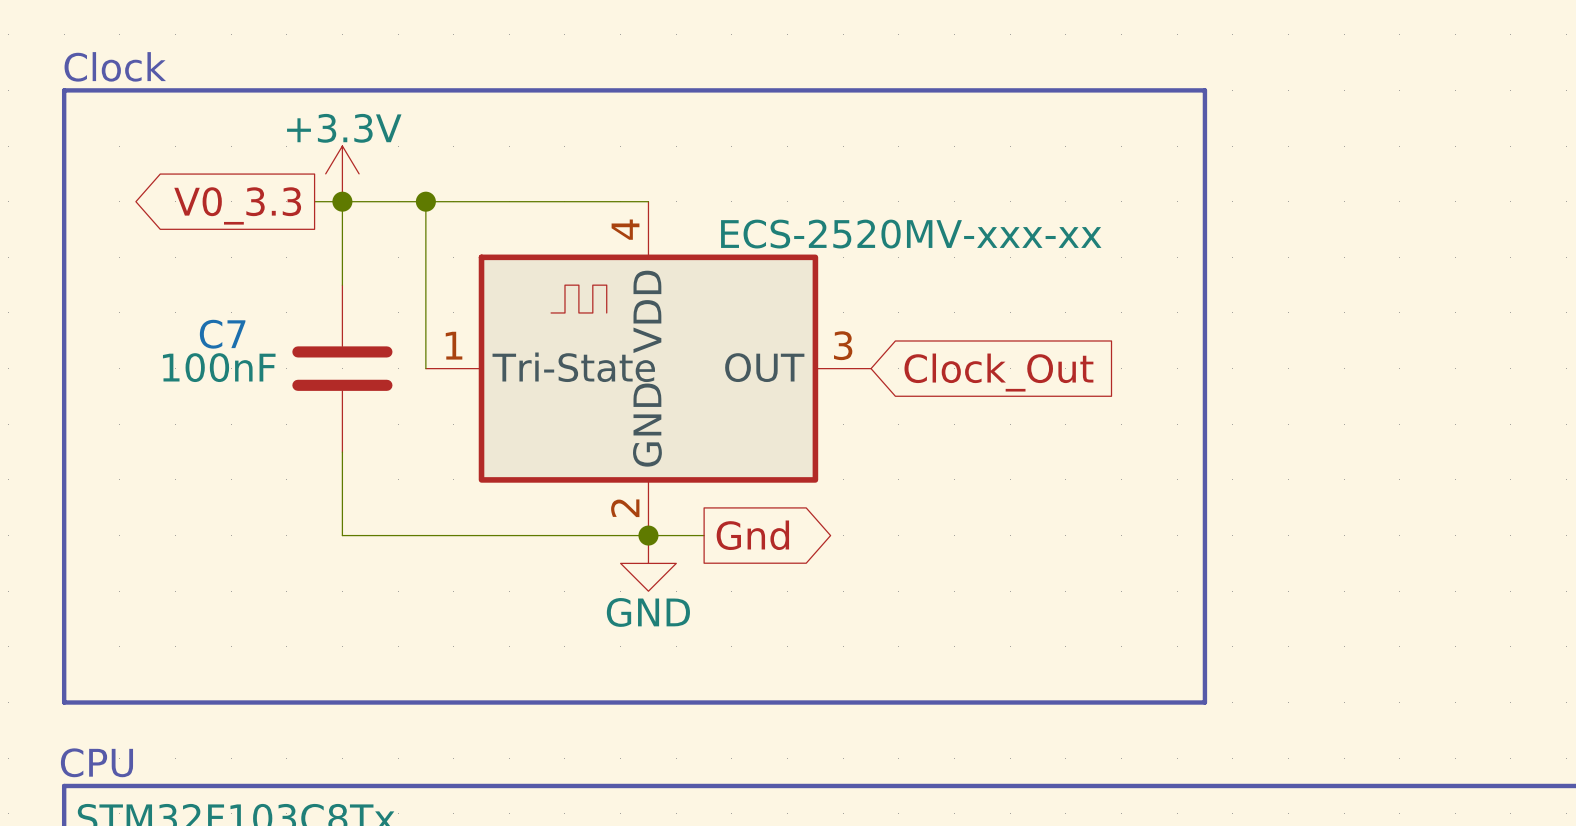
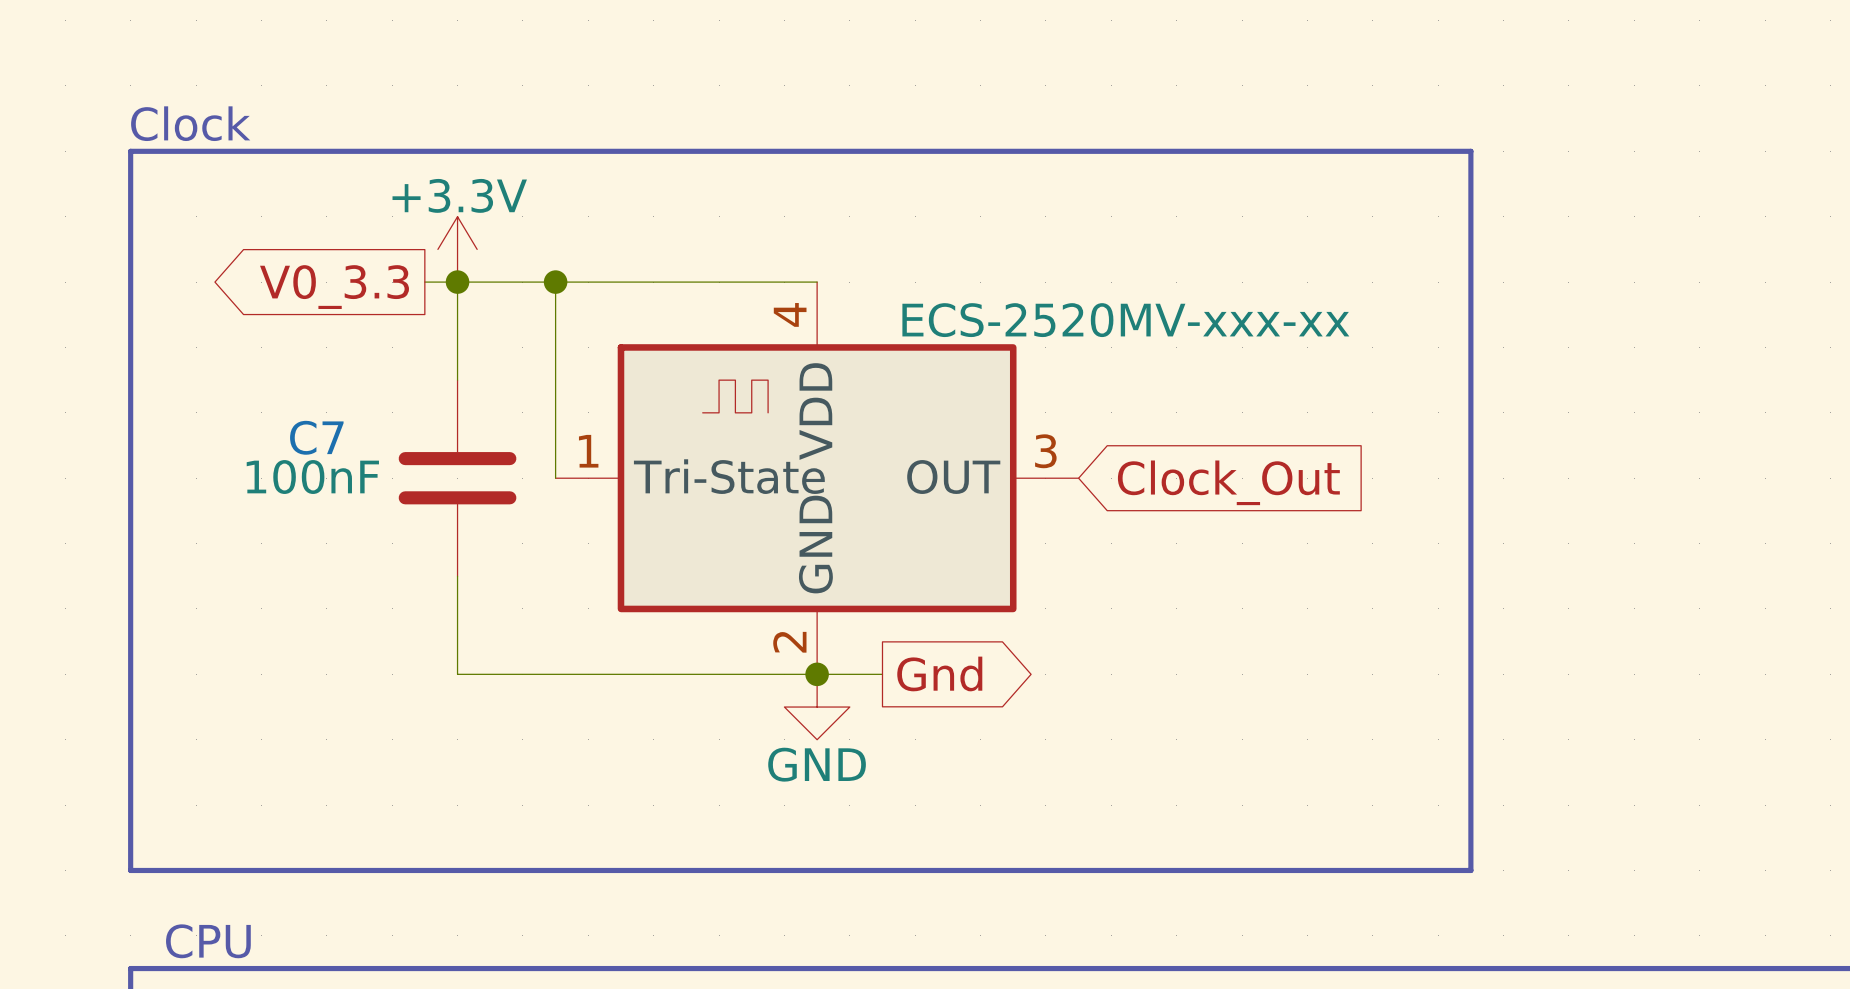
text position: CPU (96, 762) -> CPU (208, 941)

